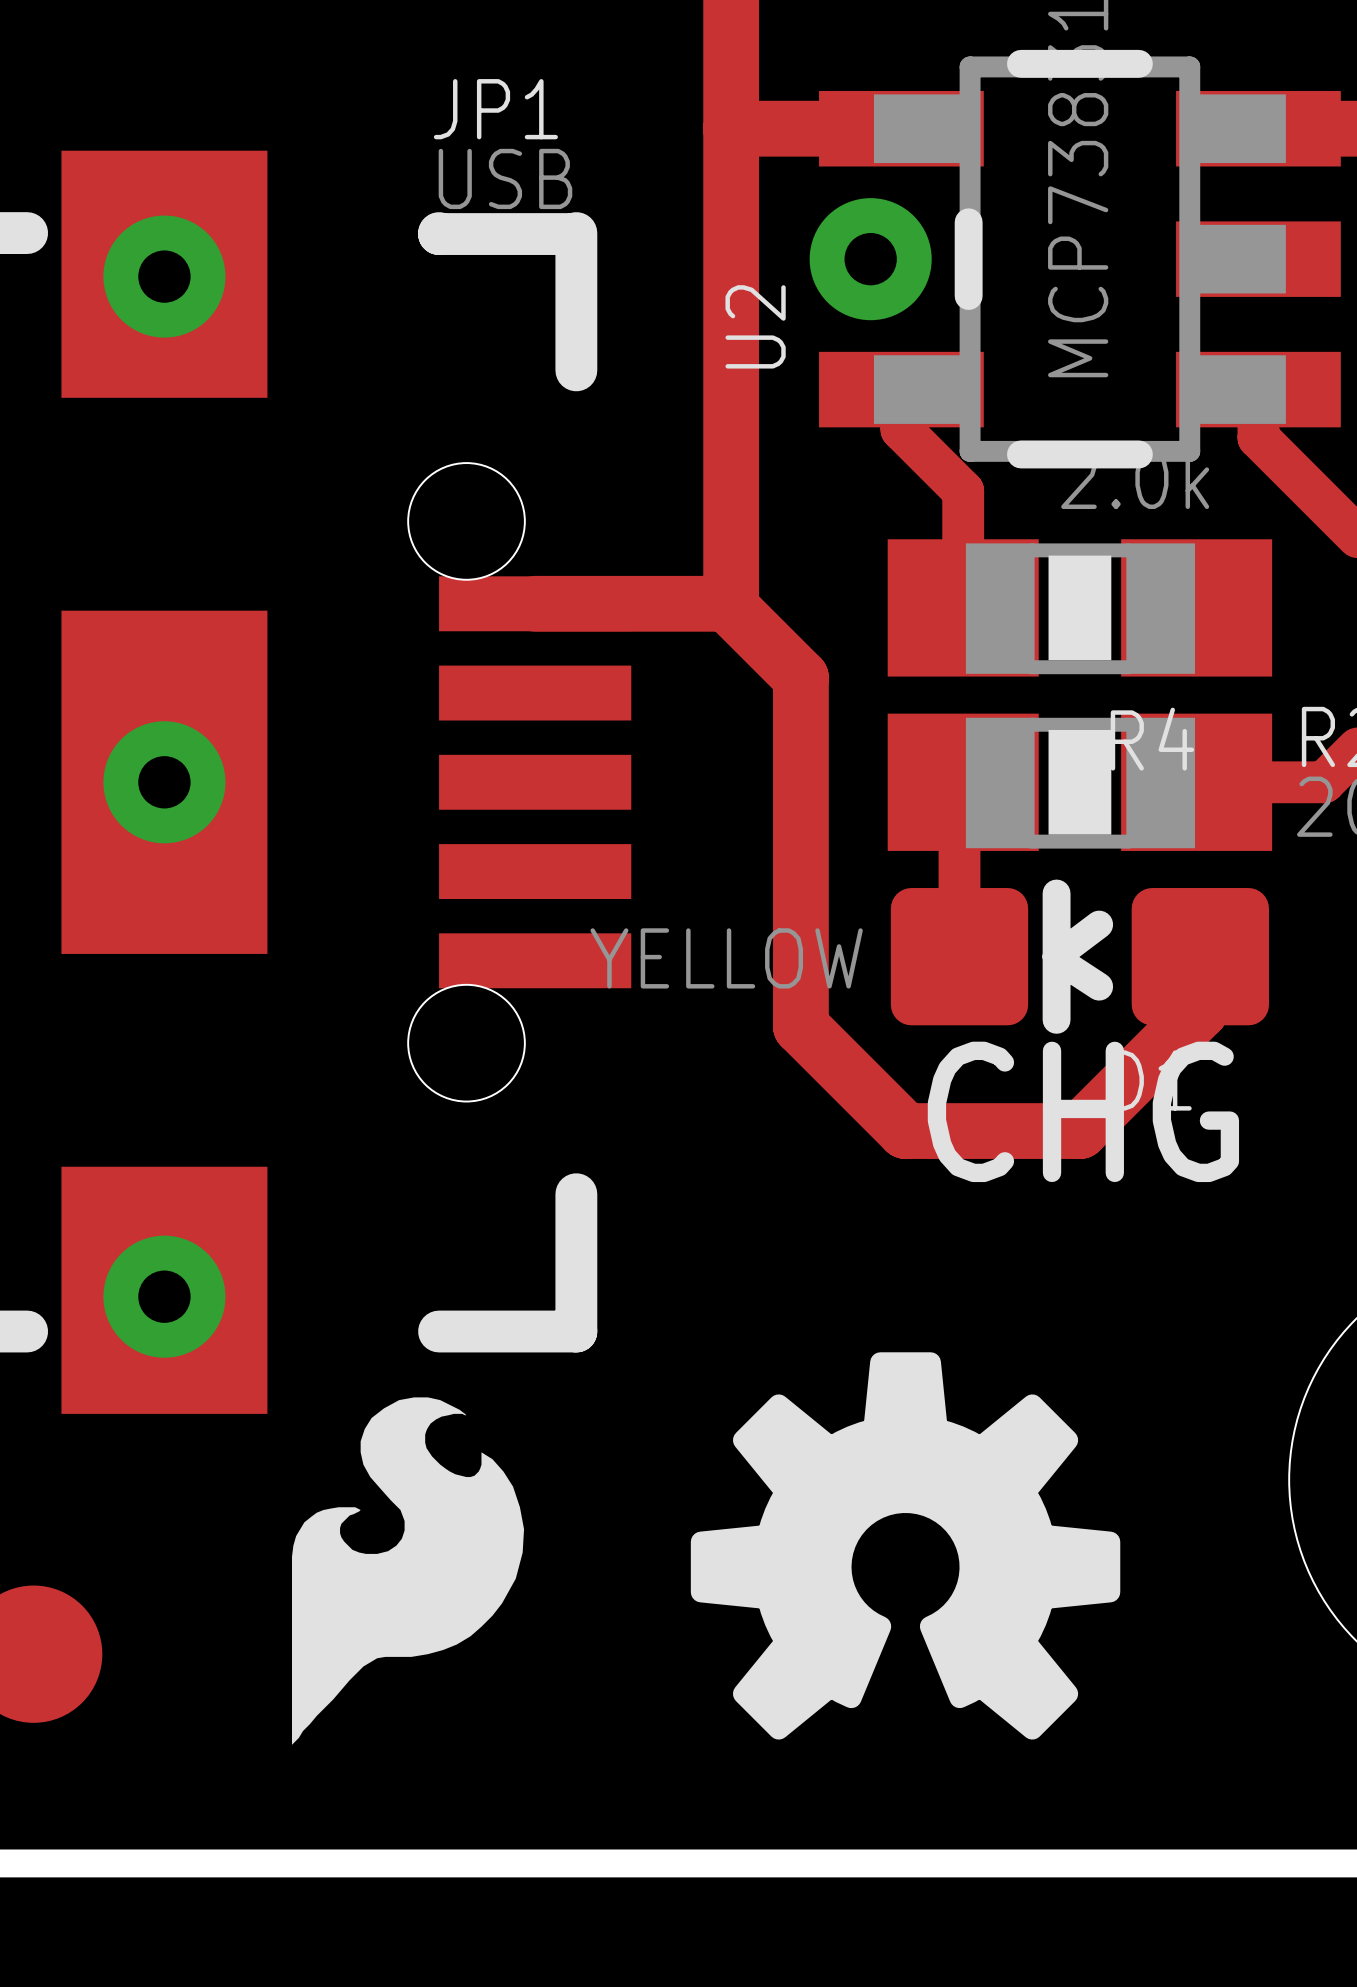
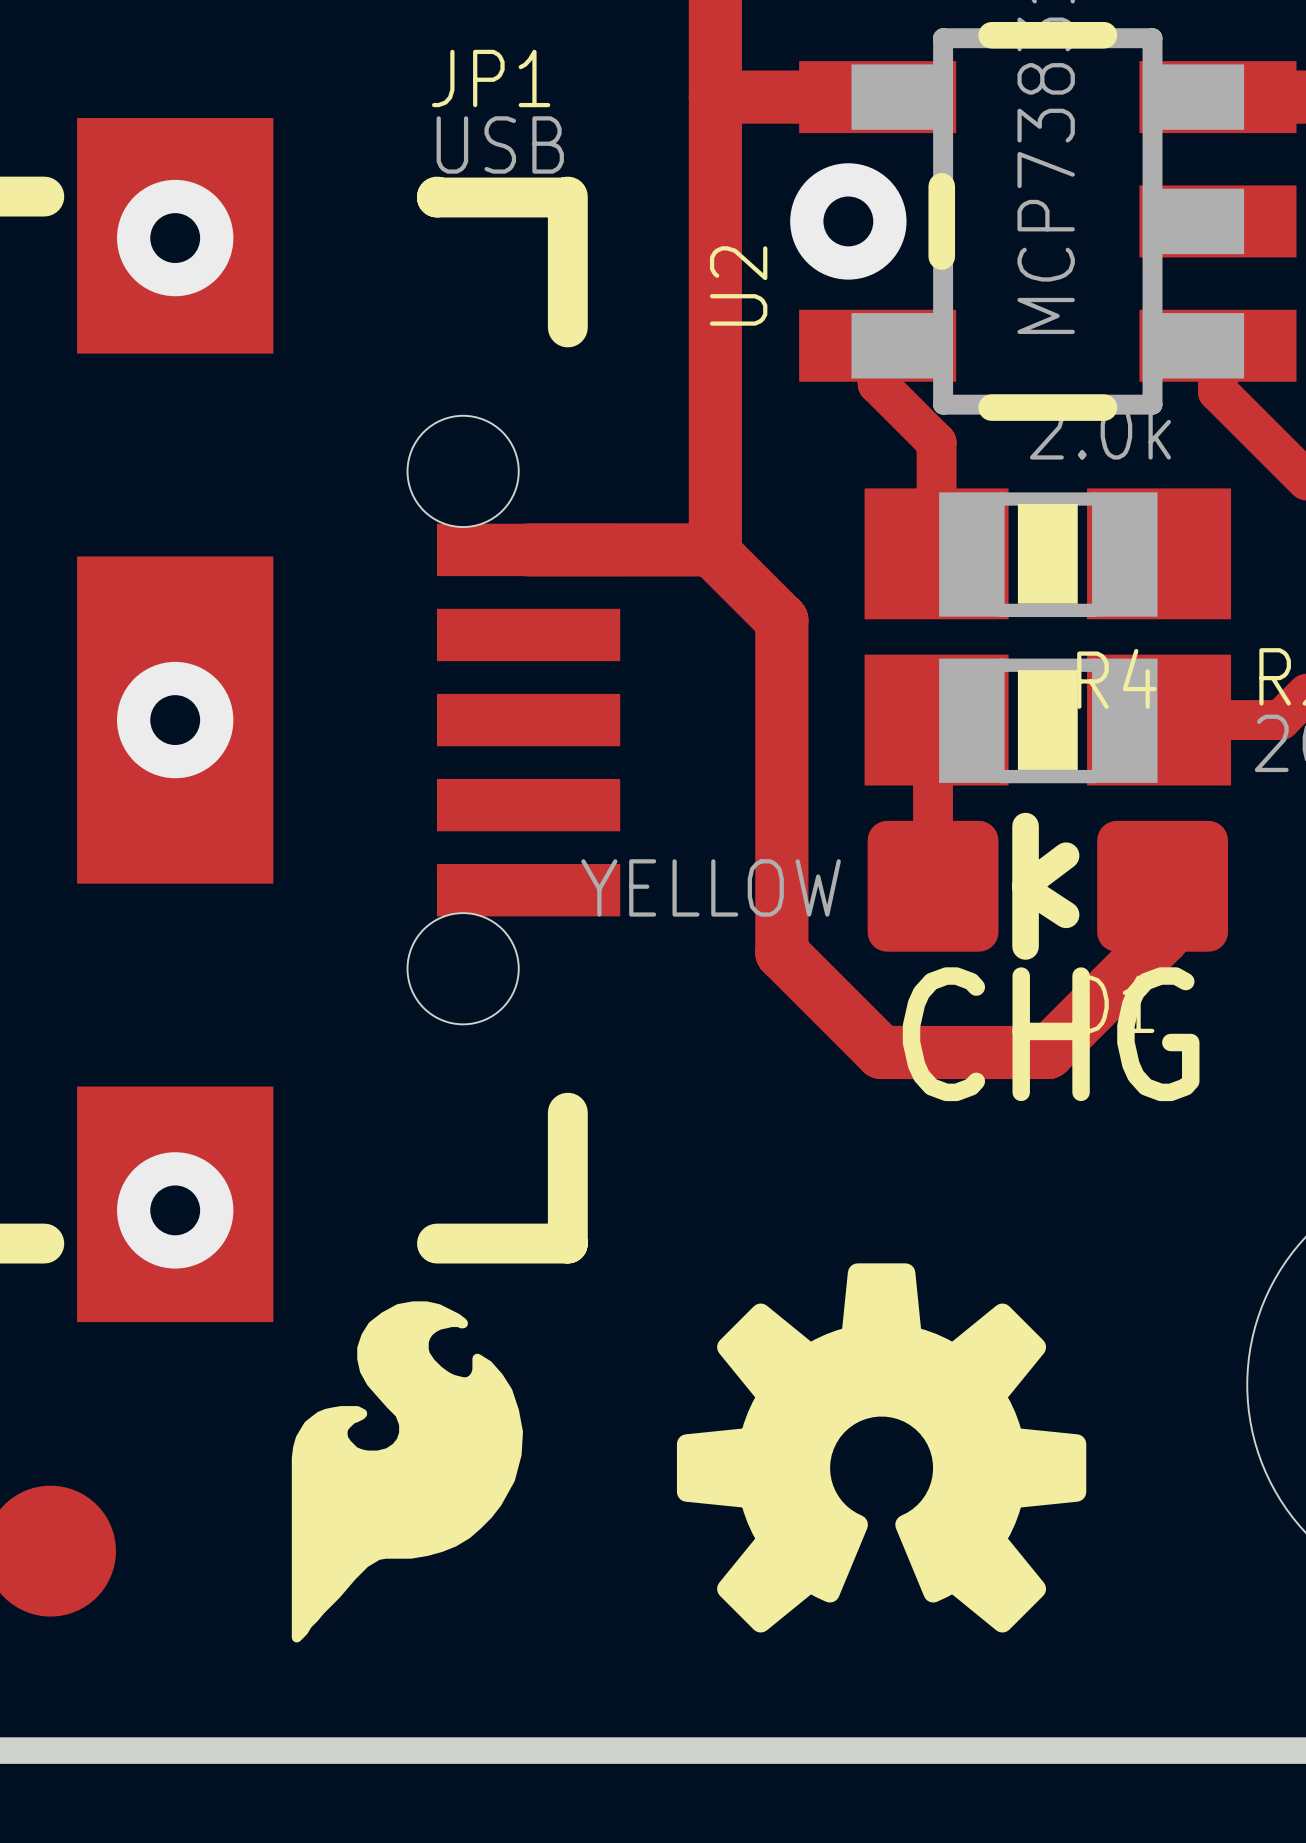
drawing shape: [292, 1397, 525, 1747] -> [291, 1301, 523, 1643]

